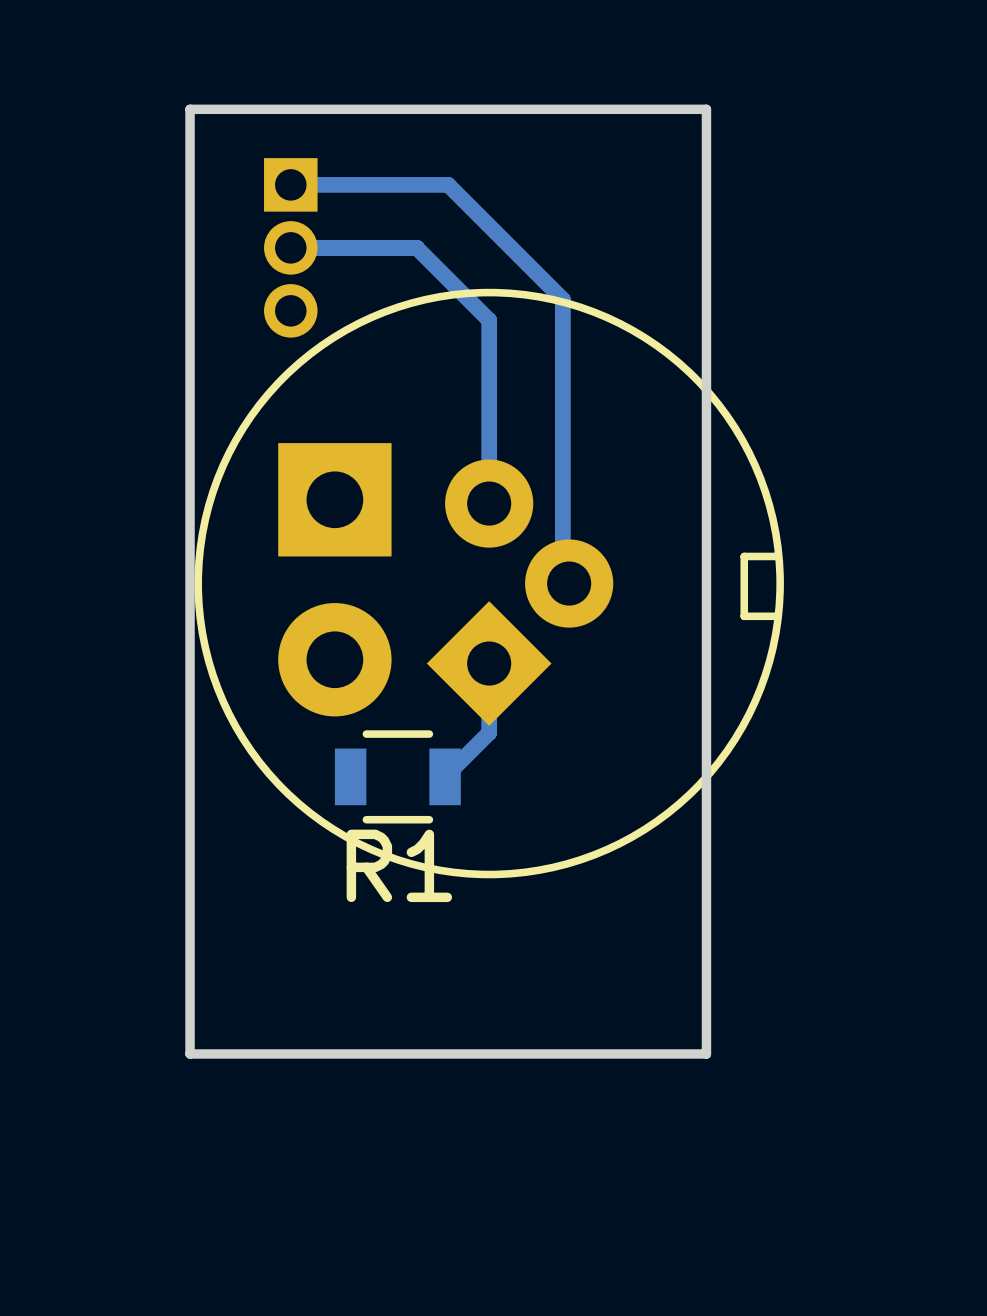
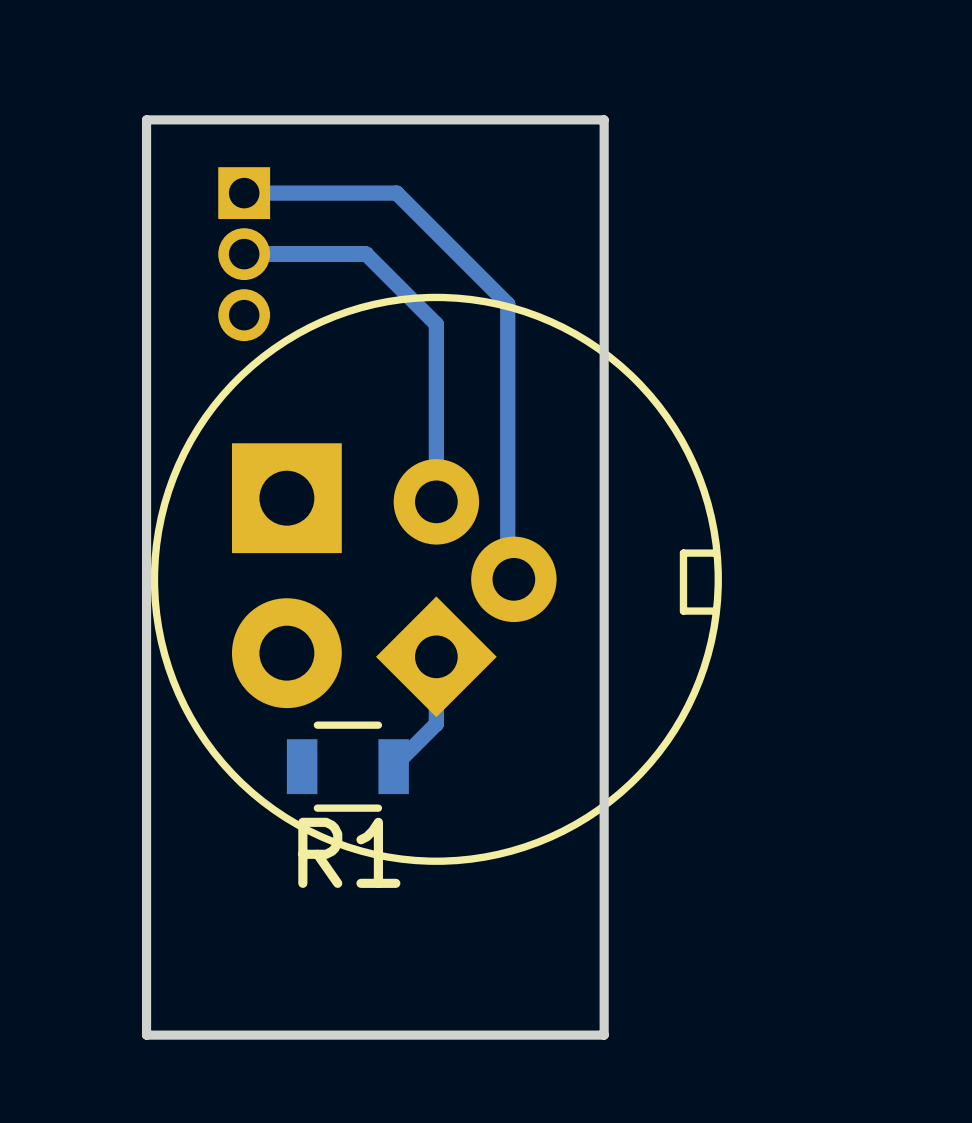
board edge: (662, 109) (706, 109) (706, 1053) (662, 1053) -> (604, 119) (604, 1035)

